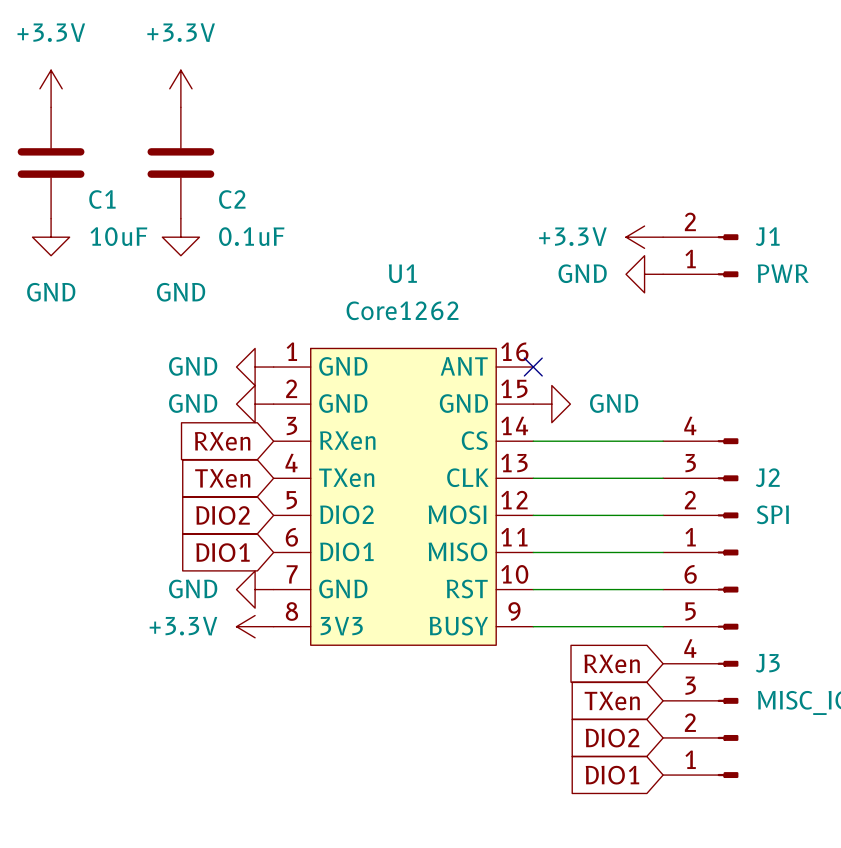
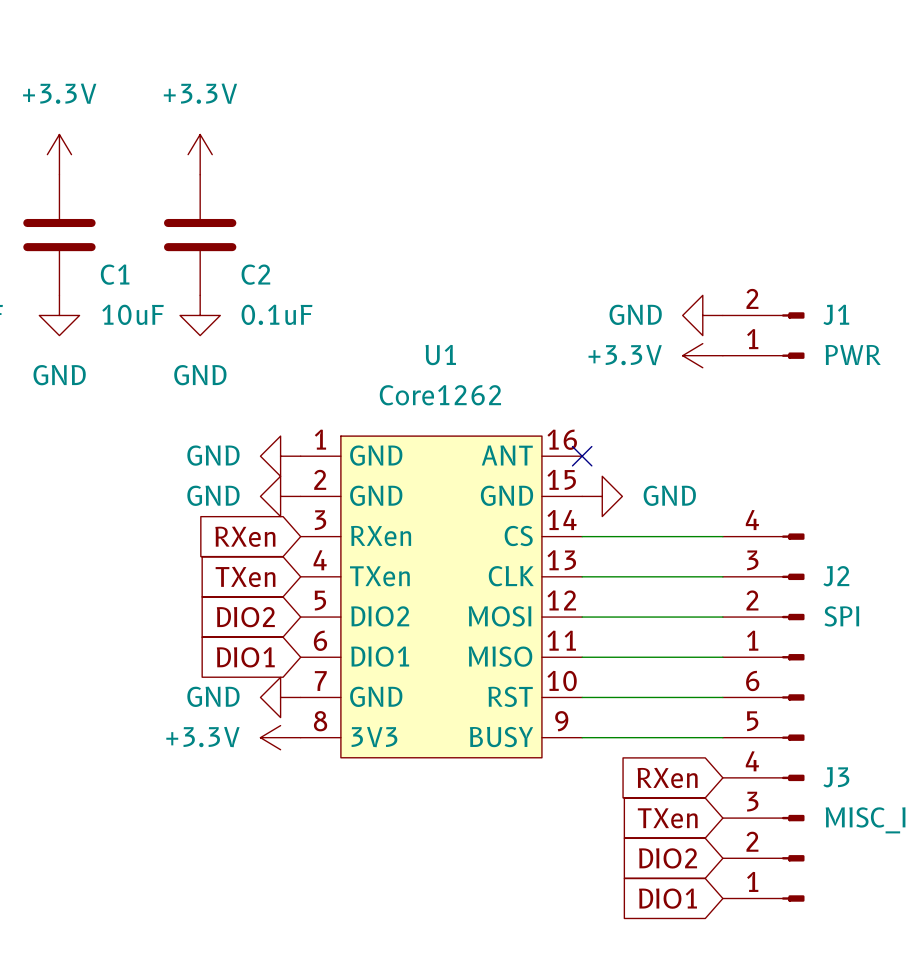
power symbol: +3.3V (644, 237) -> GND (702, 315)
power symbol: GND (644, 274) -> +3.3V (702, 355)

